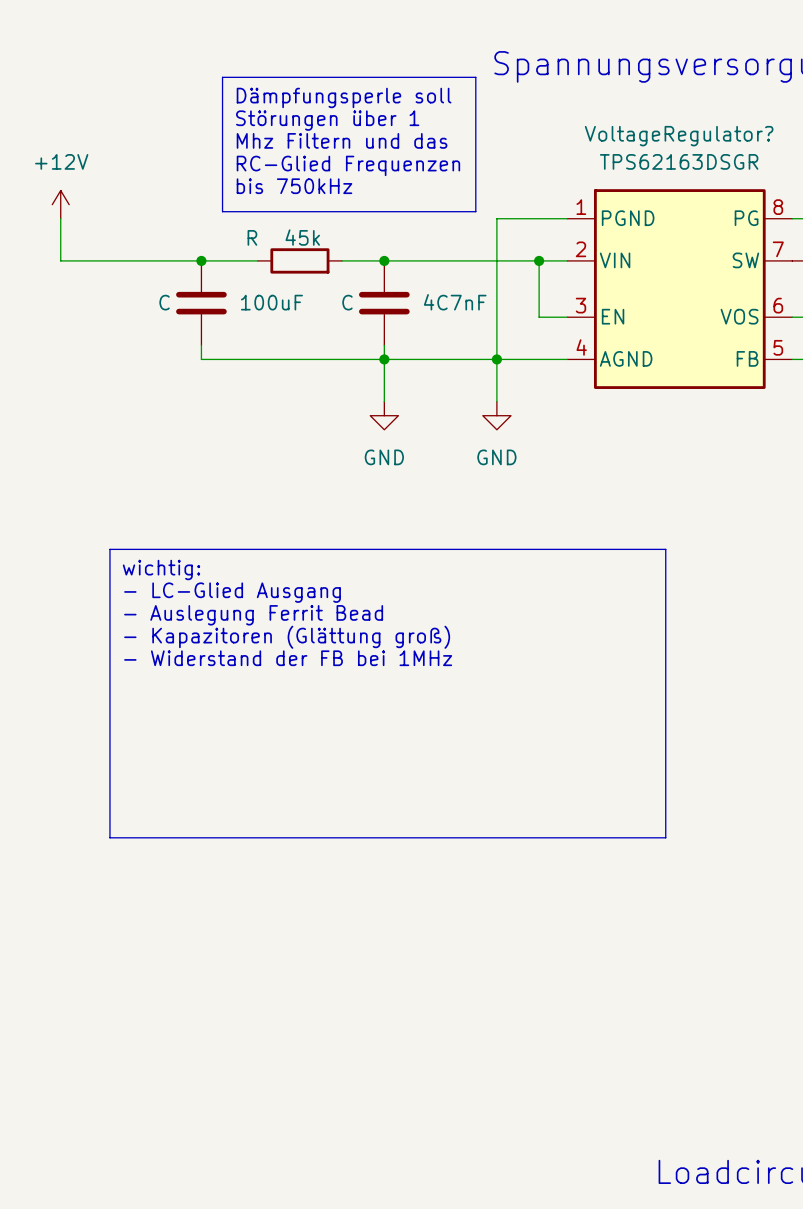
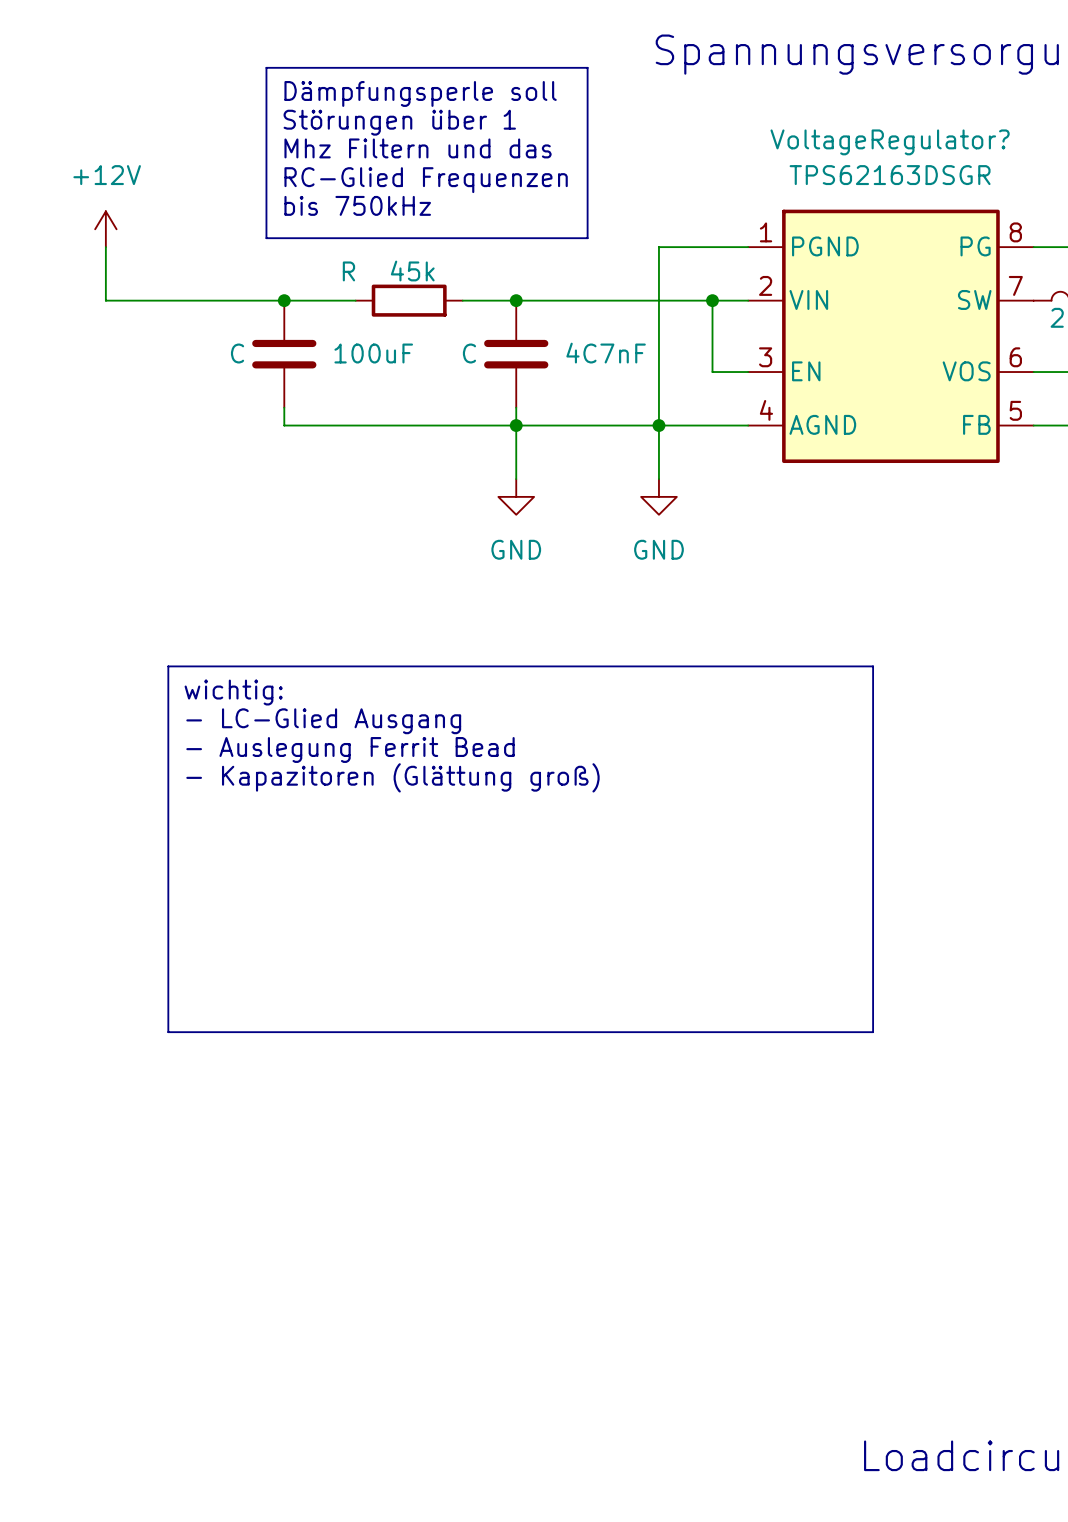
line: (222, 77) (222, 211) -> (311, 67) (266, 67) (266, 238) (311, 238)
line: (440, 77) (475, 77) (475, 211) (440, 211) -> (587, 67) (587, 238)
text position: Dämpfungsperle soll (344, 97) -> Dämpfungsperle soll (420, 93)
text position: Störungen über 1 (327, 120) -> Störungen über 1 (399, 122)
text position: Mhz Filtern und das (342, 140) -> Mhz Filtern und das (418, 148)
text position: RC-Glied Frequenzen (348, 165) -> RC-Glied Frequenzen (426, 180)
text position: bis 750kHz (294, 186) -> bis 750kHz (357, 205)
text: - Widerstand der FB bei 1MHz (288, 658) -> none

